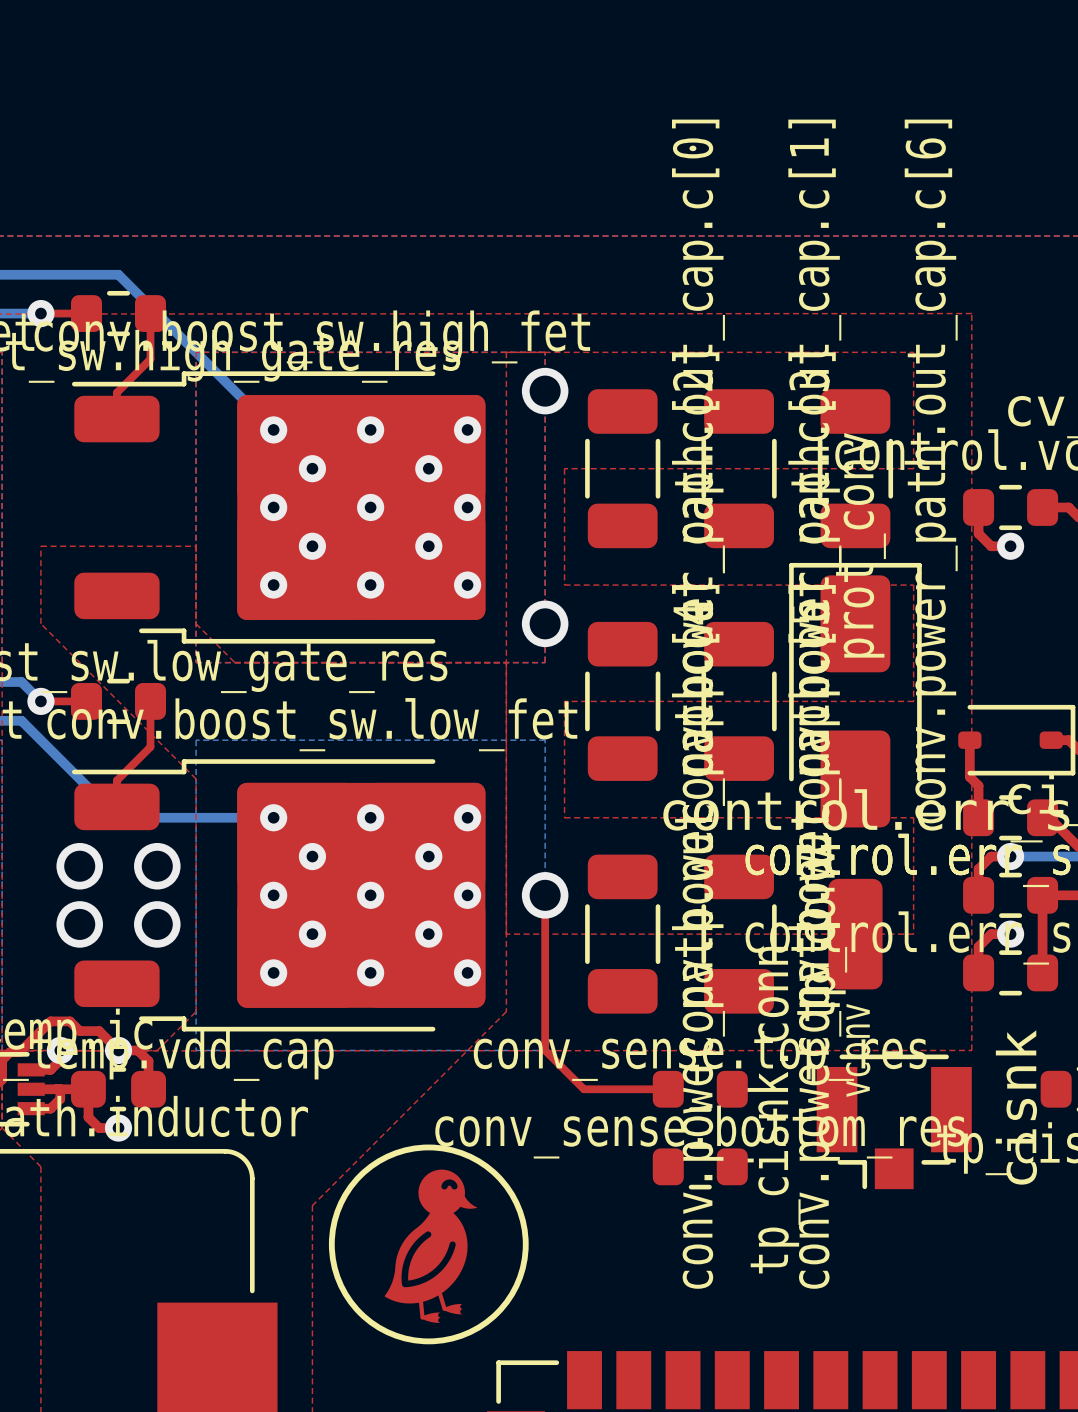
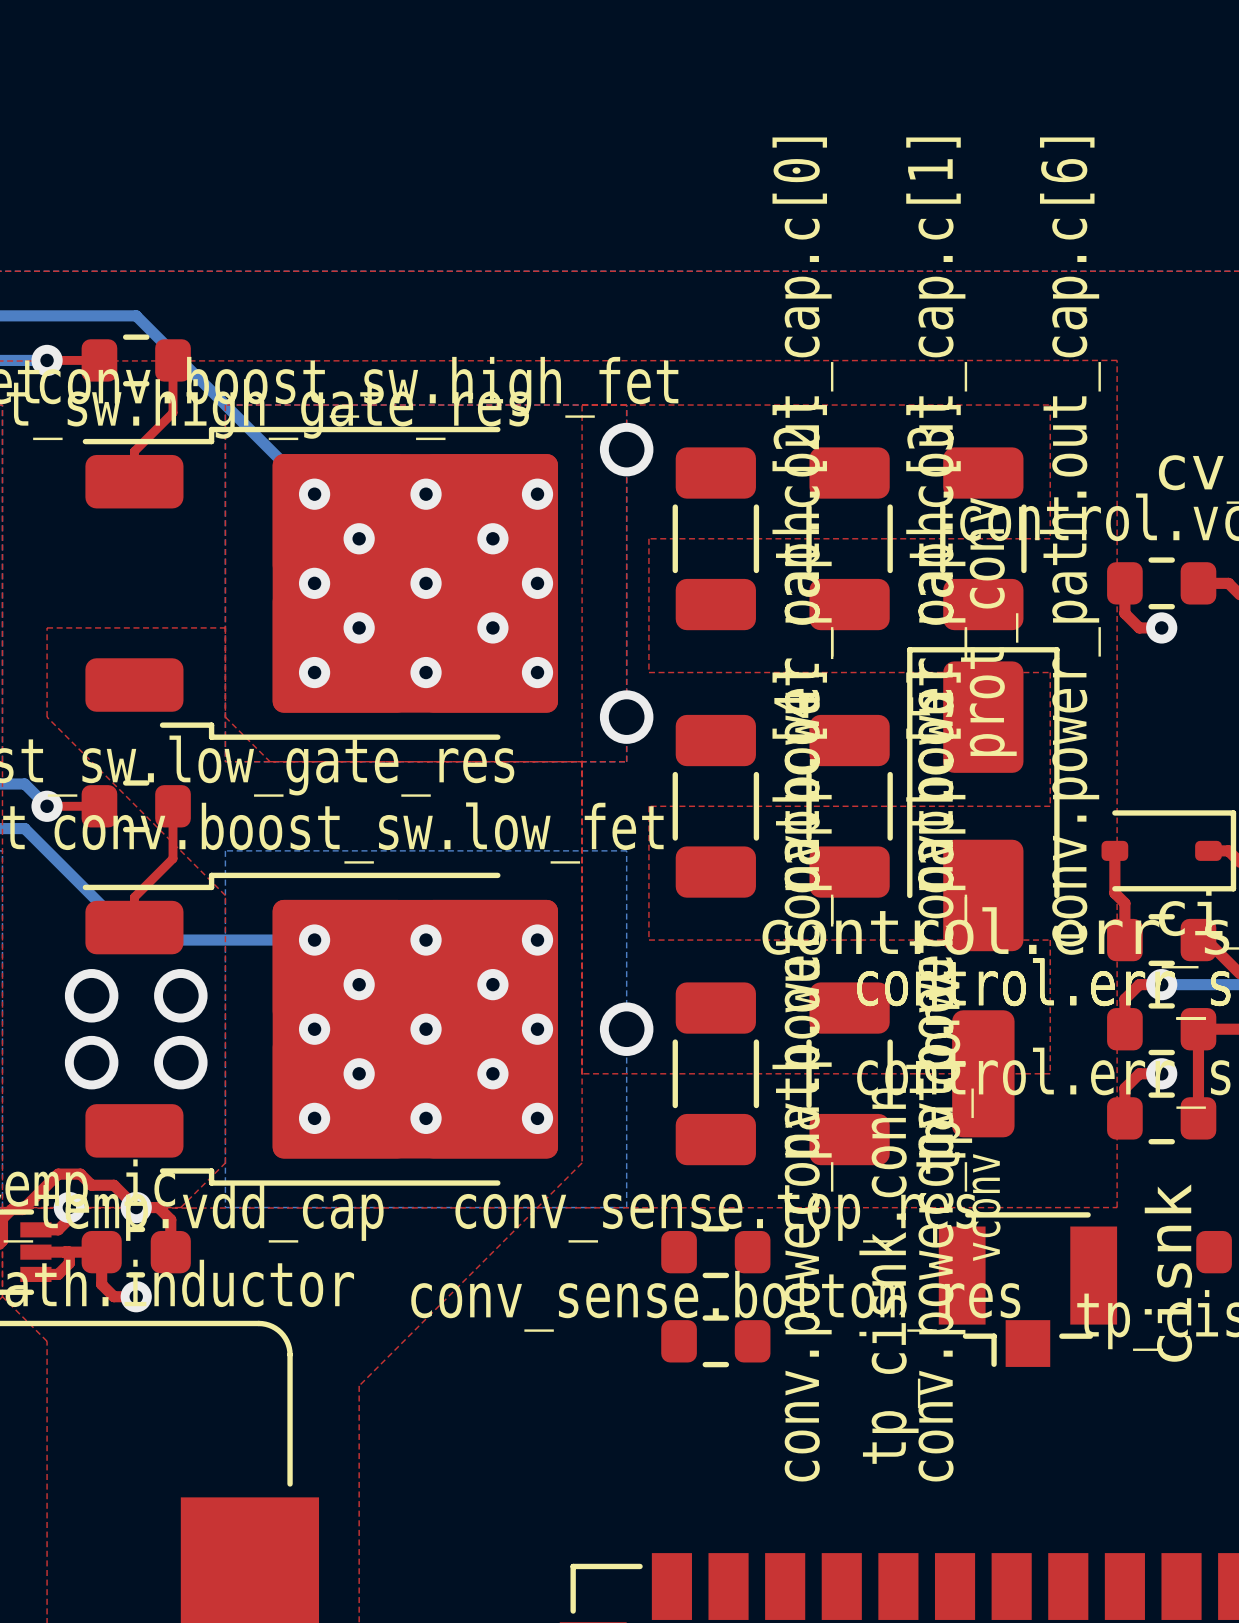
top track: (545, 895) (545, 1050) (583, 1089) (668, 1089) -> none
conv_sense.top_res position: (700, 1089) -> (715, 1252)
conv_sense.bottom_res position: (700, 1166) -> (715, 1341)
part: (428, 1244) -> none

